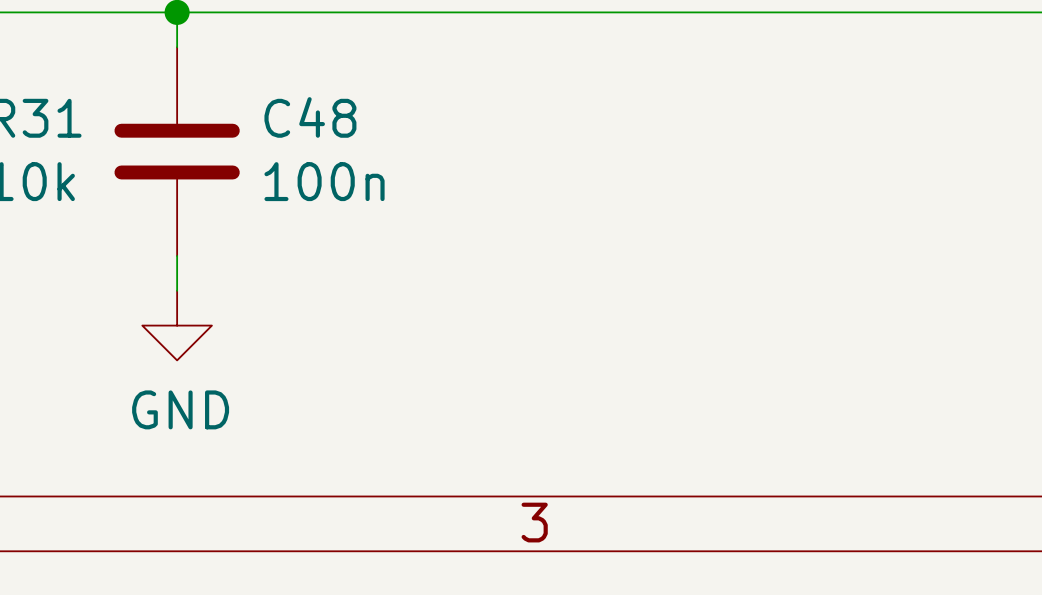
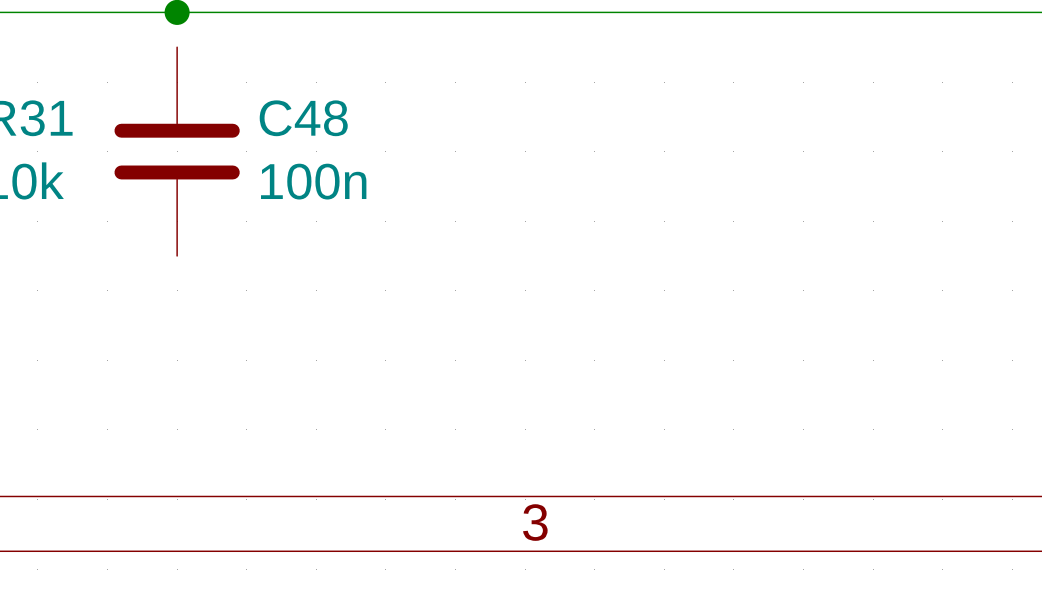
wire: (177, 12) (177, 47) -> none
wire: (177, 255) (177, 290) -> none
power symbol: GND (177, 325) -> none

